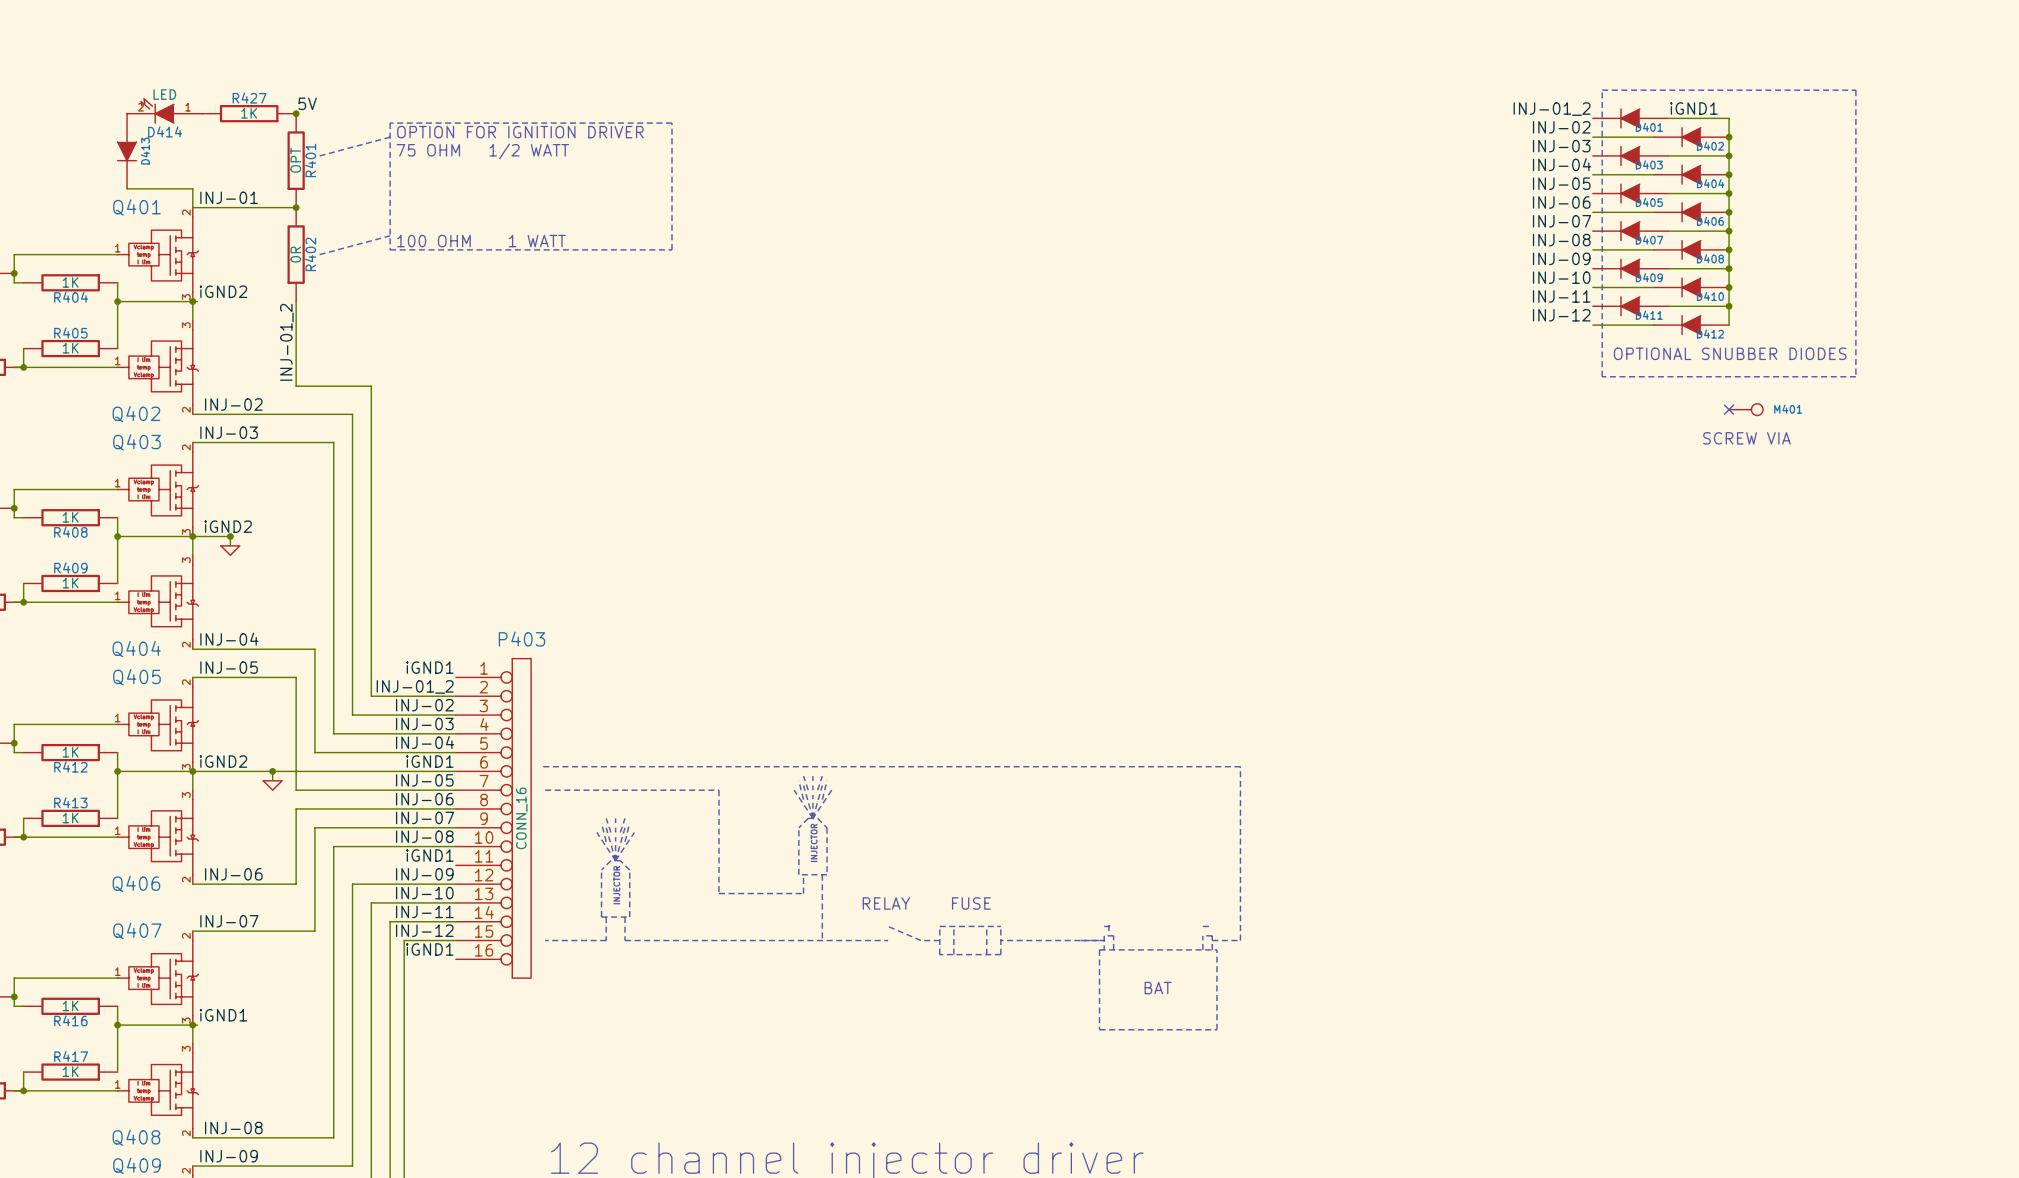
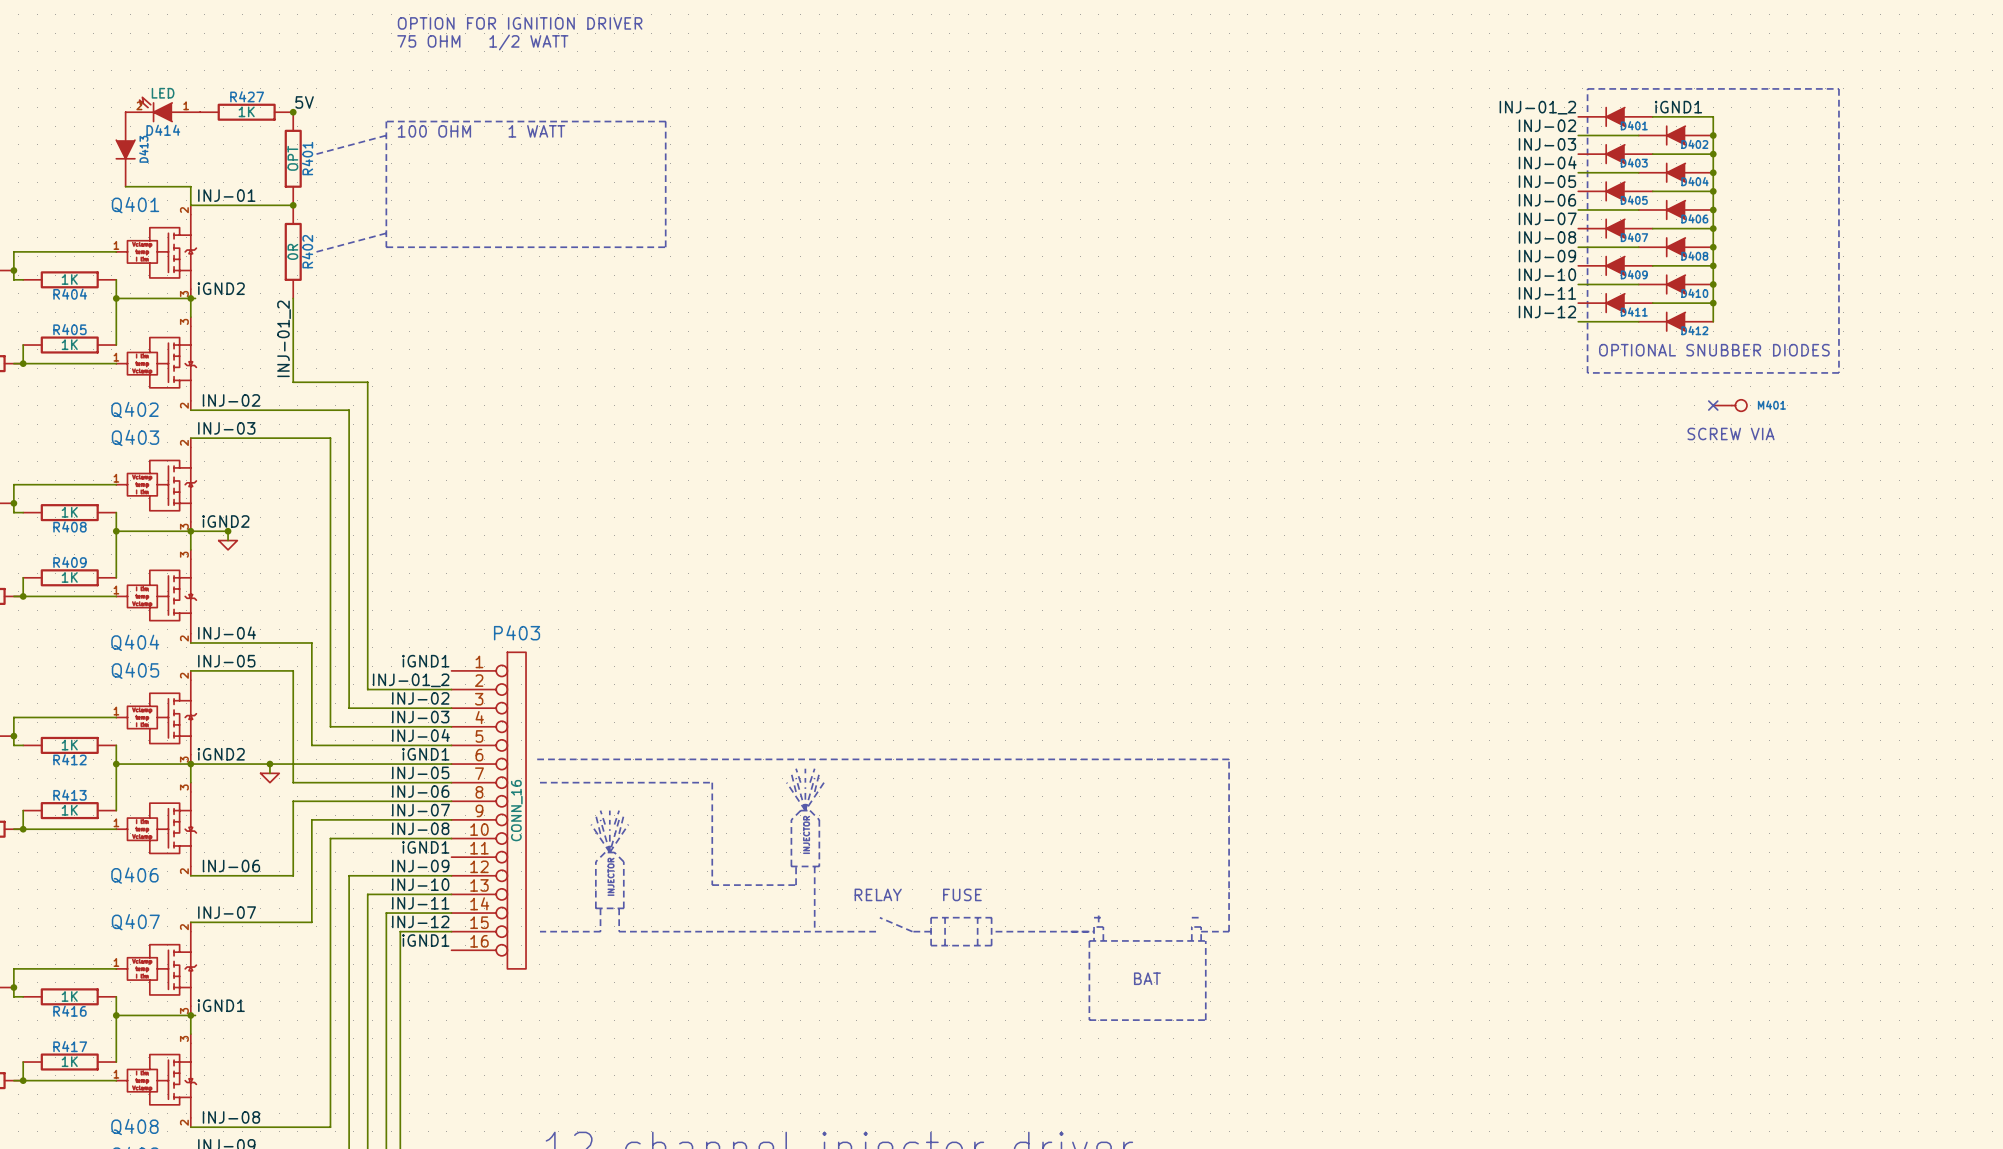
text position: OPTION FOR IGNITION DRIVER (520, 132) -> OPTION FOR IGNITION DRIVER (520, 23)
text position: 75 OHM 1/2 WATT (482, 151) -> 75 OHM 1/2 WATT (482, 42)
text position: 100 OHM 1 WATT (481, 241) -> 100 OHM 1 WATT (481, 131)

